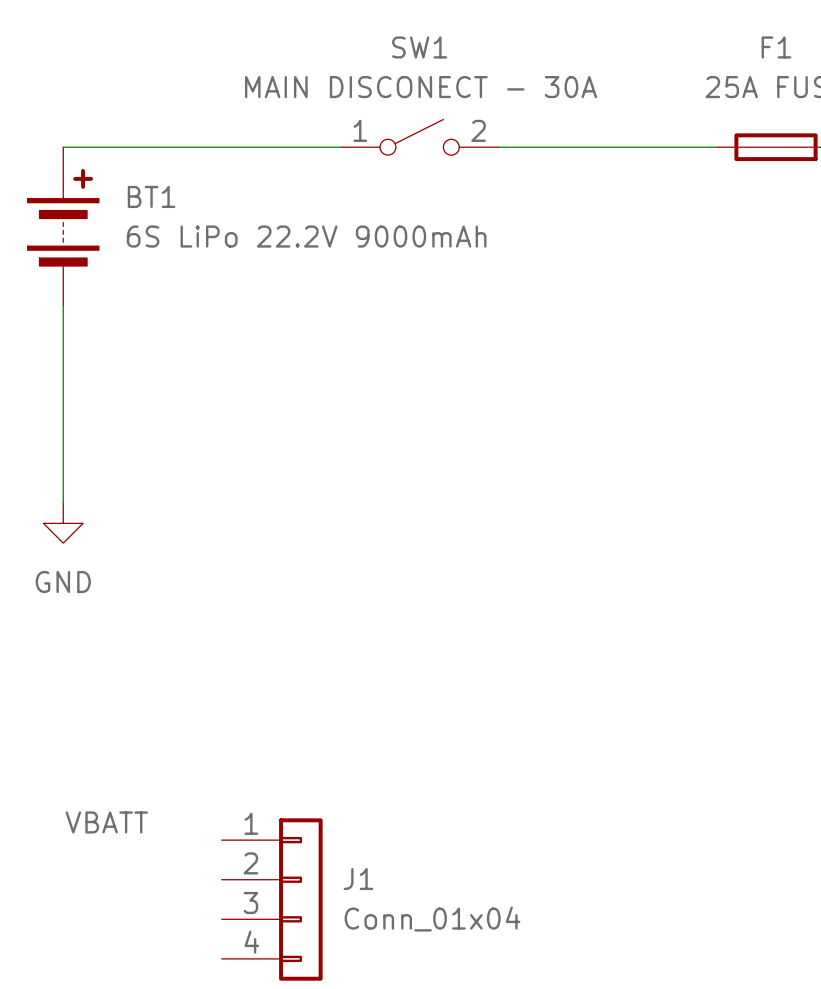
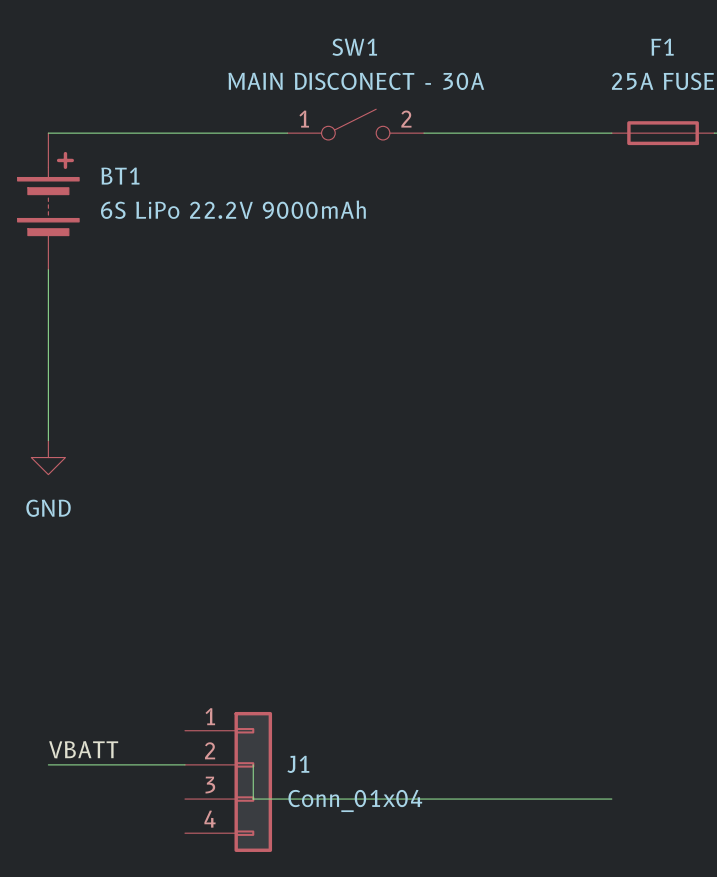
label position: VBATT (106, 822) -> VBATT (83, 749)
wire: none -> (48, 764) (184, 764)
wire: none -> (253, 764) (253, 799) (611, 799)

